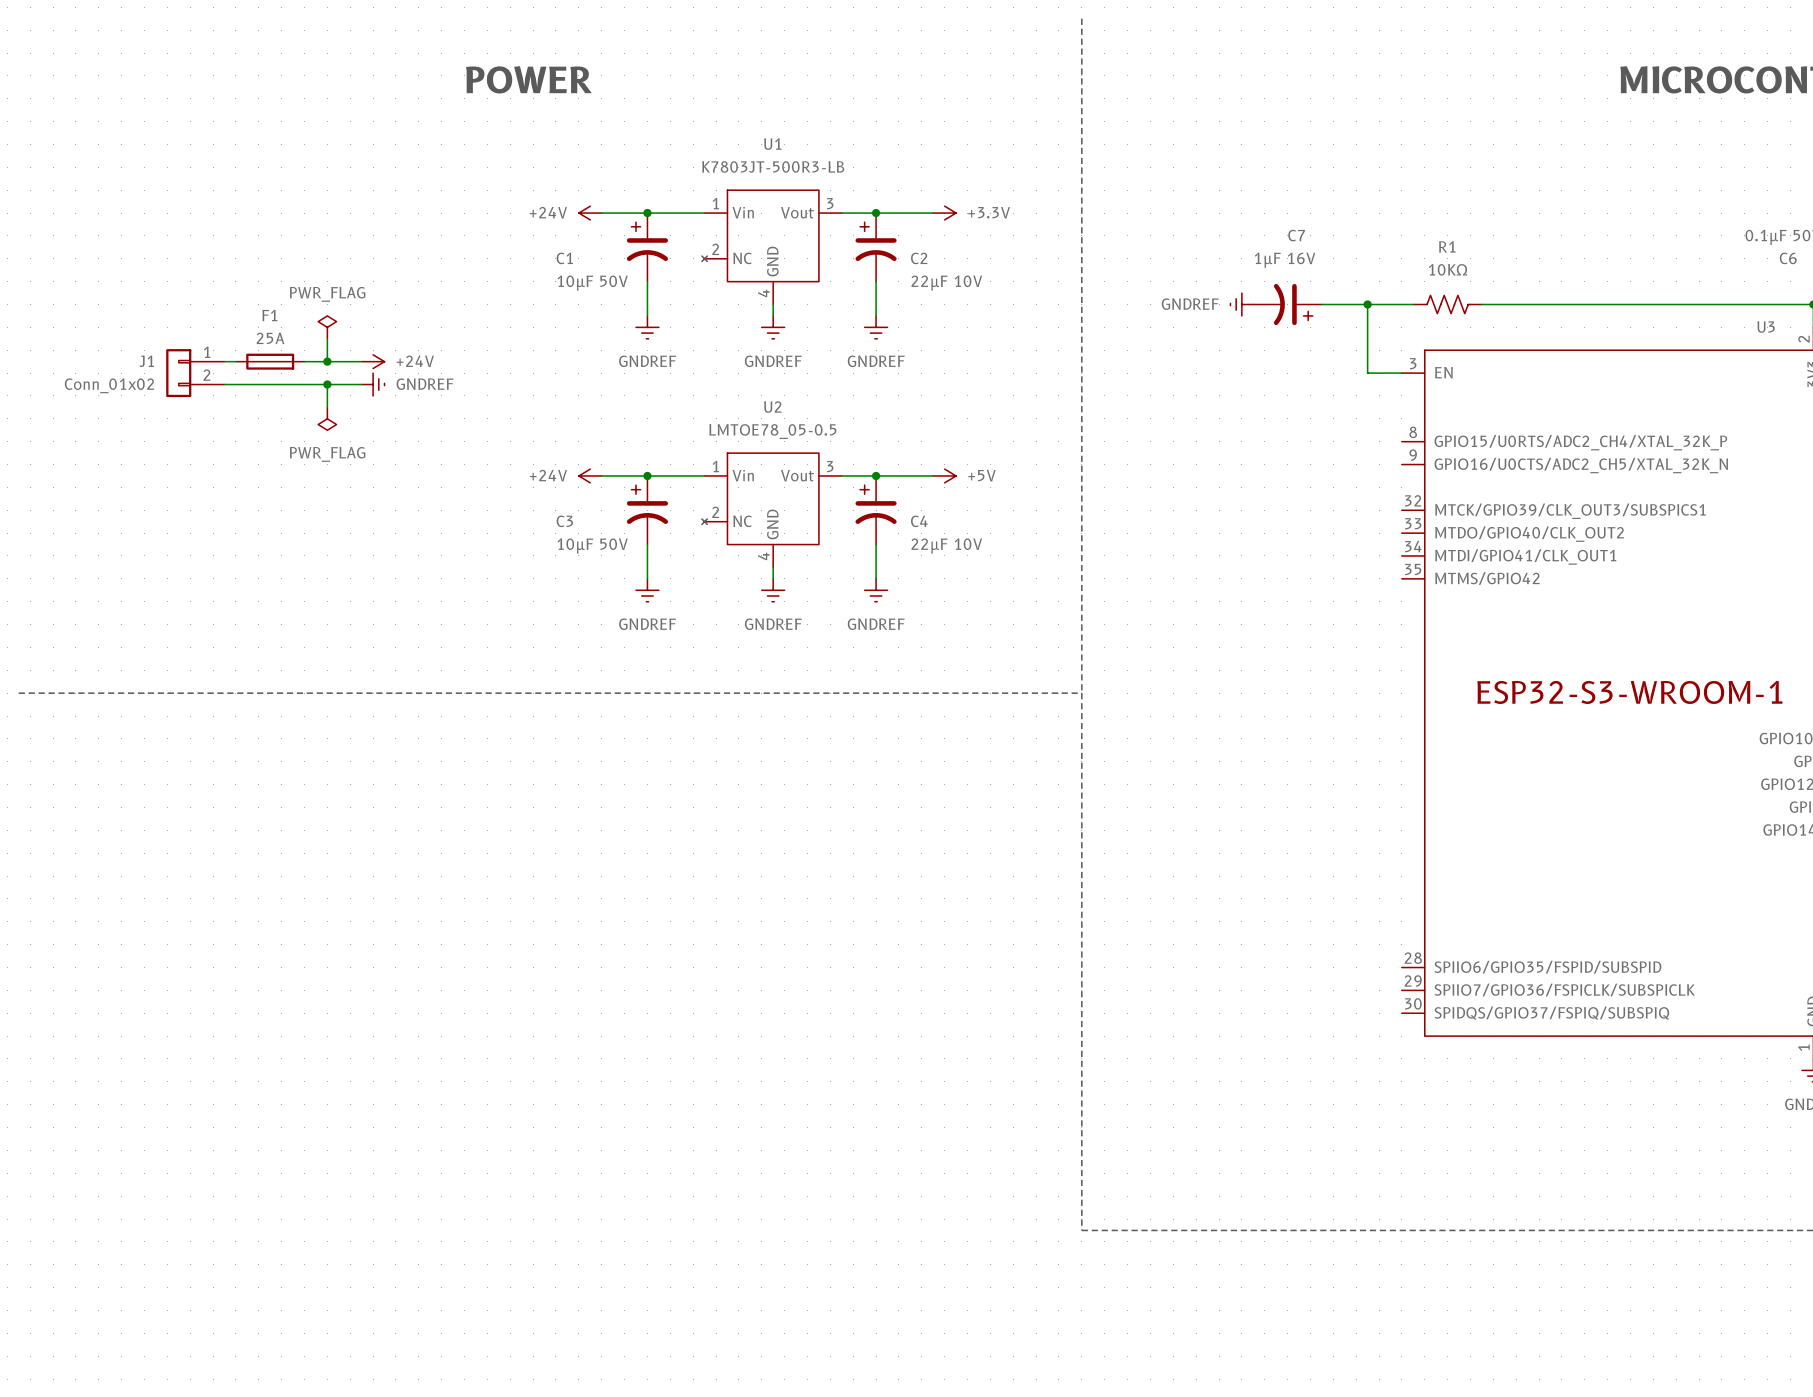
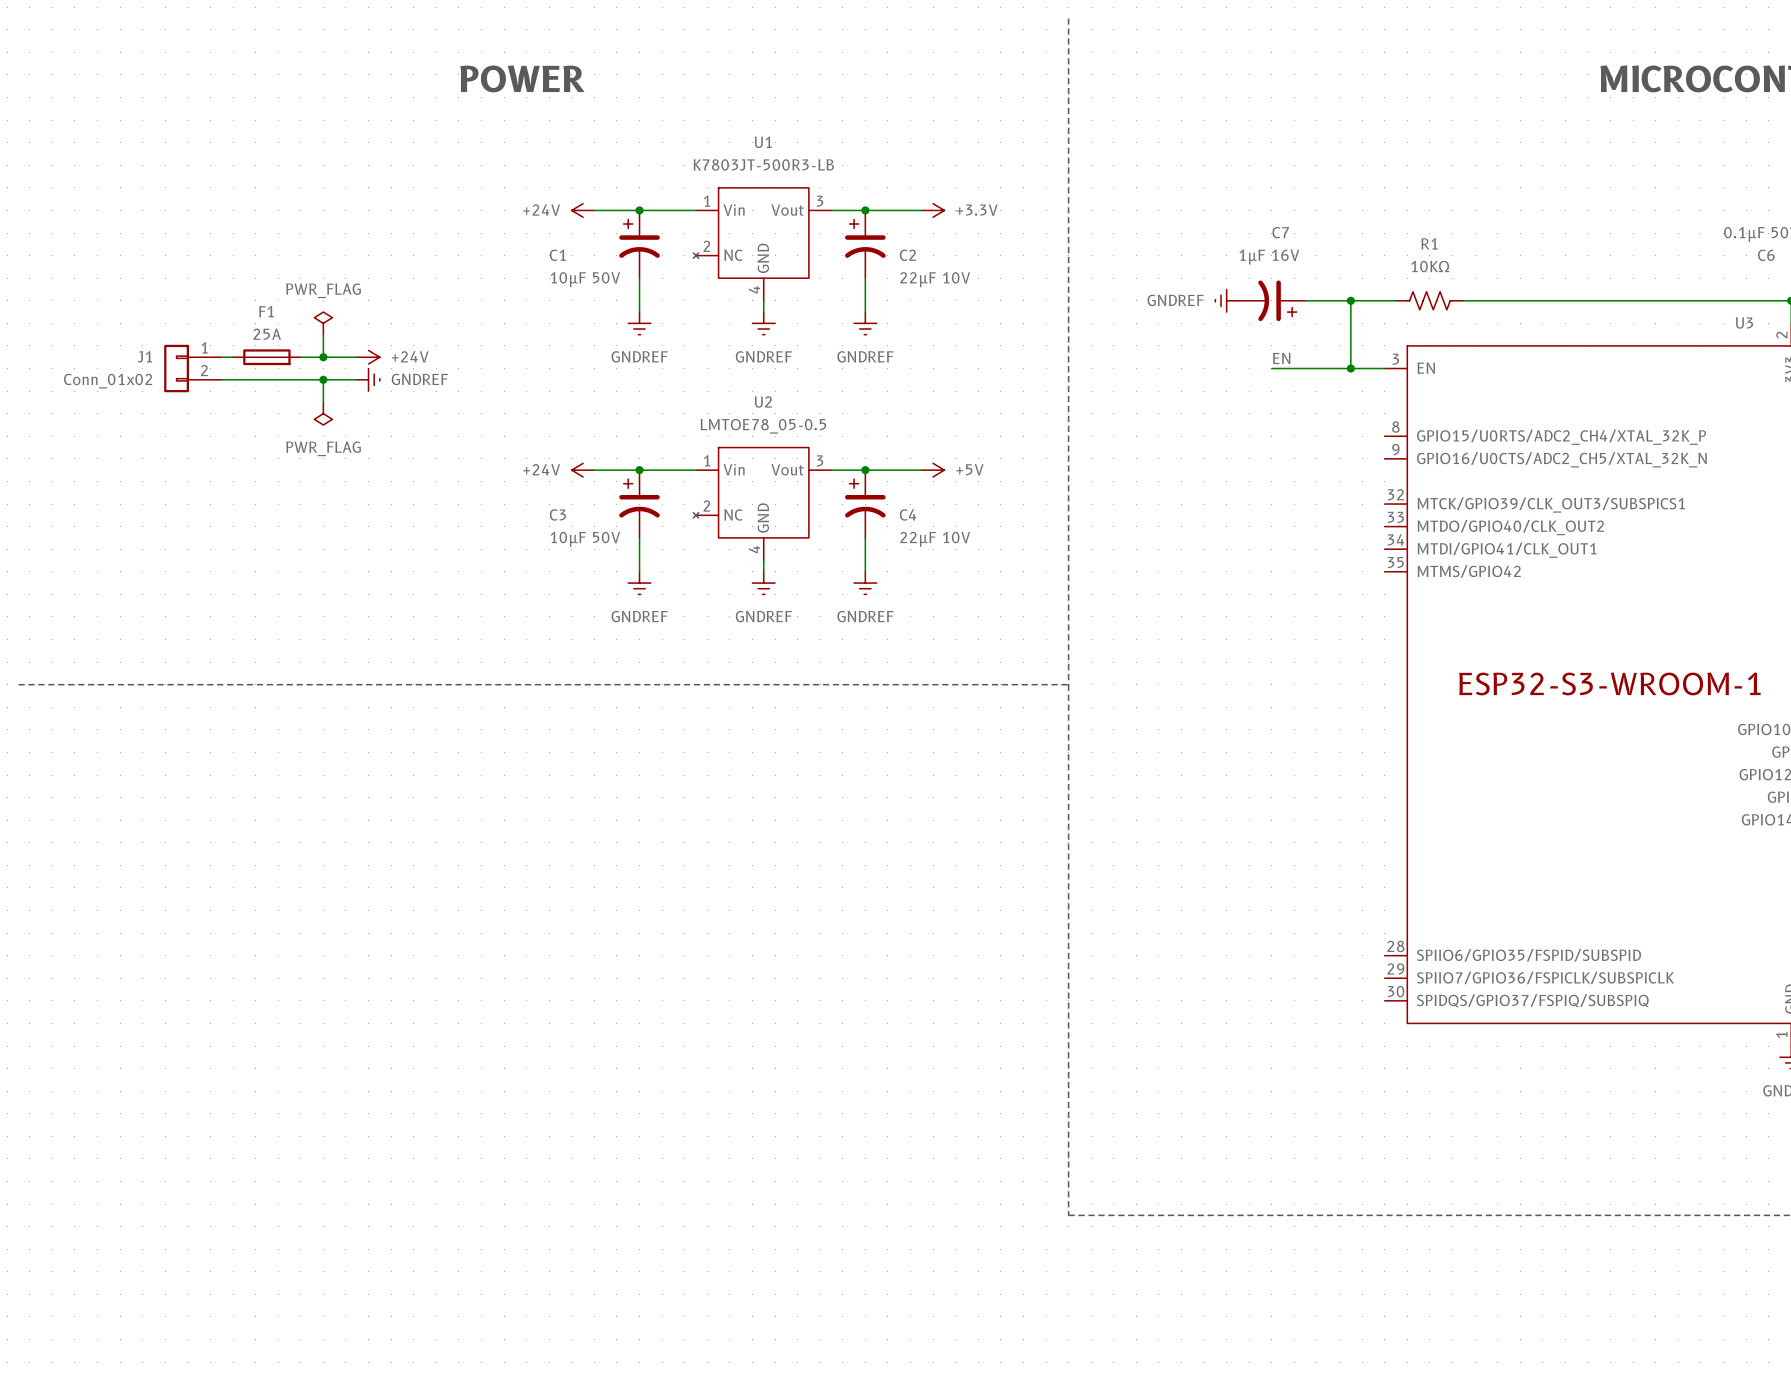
label: none -> EN (1281, 358)
wire: none -> (1271, 368) (1350, 368)
junction: none -> (1350, 368)

